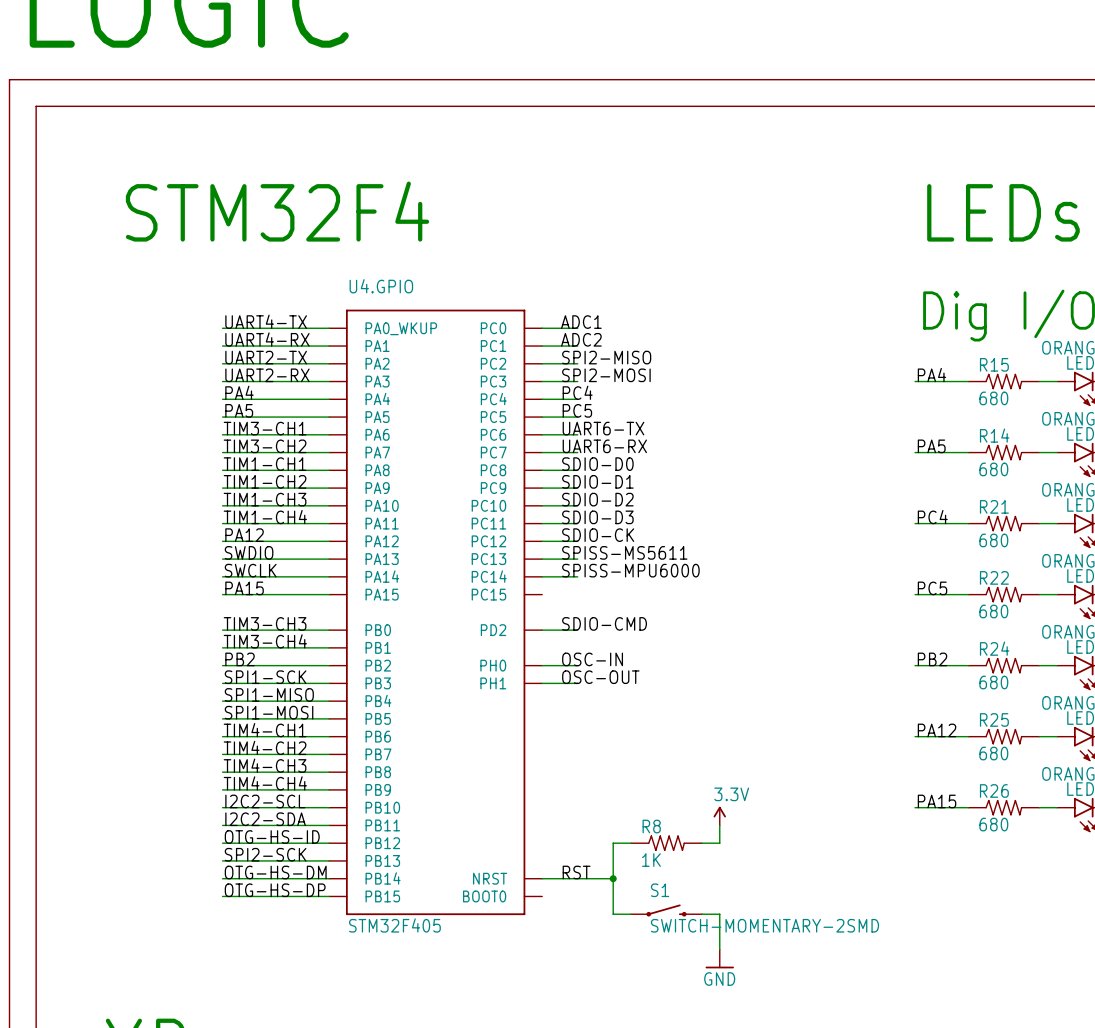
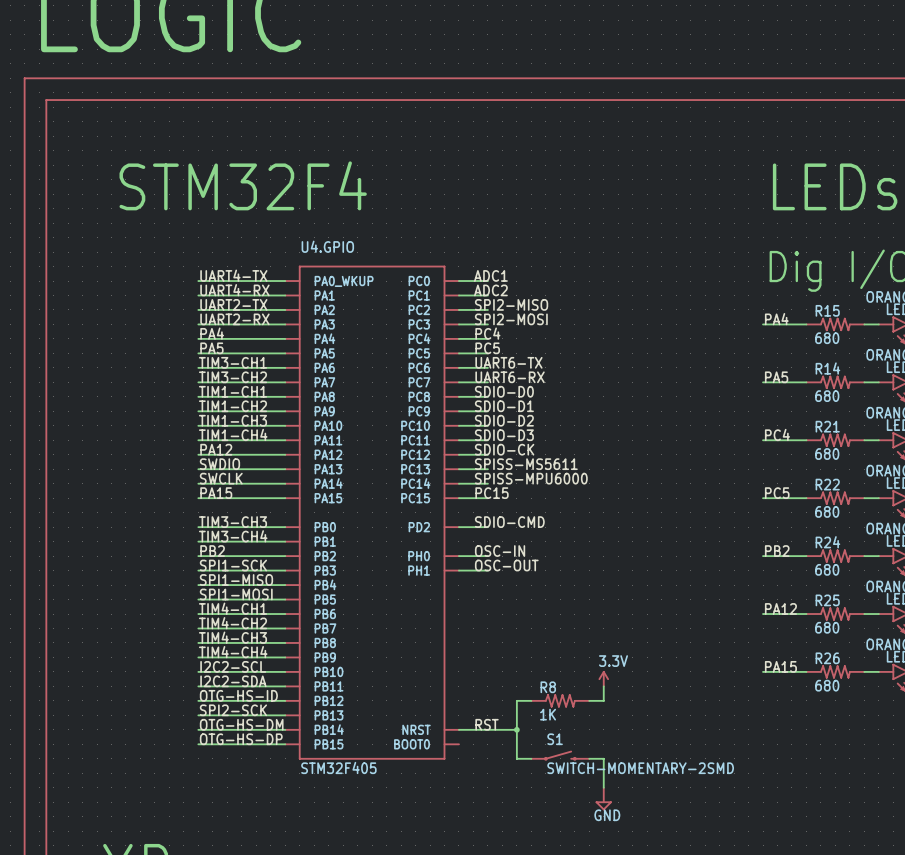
label: none -> PC15 (492, 493)
wire: none -> (458, 498) (487, 498)
power symbol shape: [705, 949, 734, 969] -> [595, 787, 612, 811]

